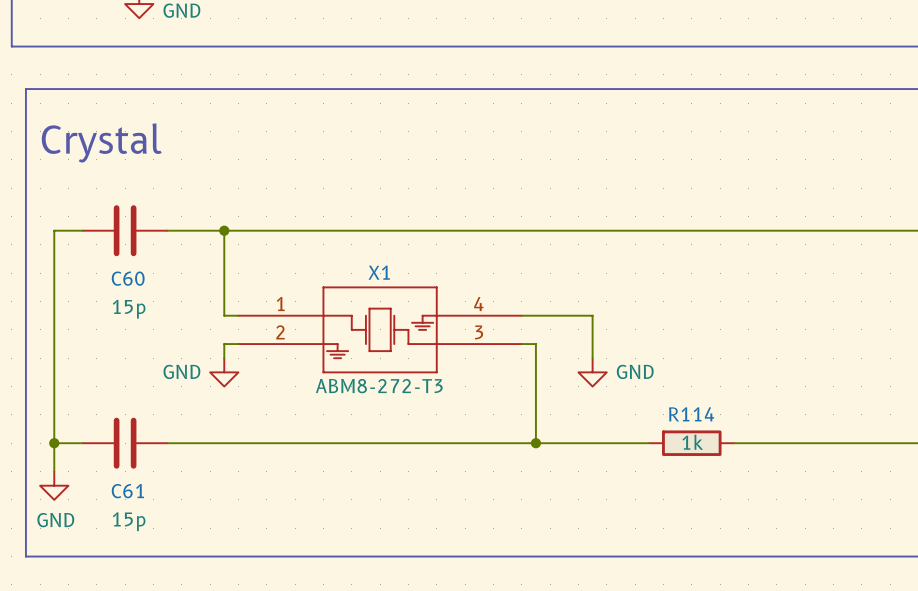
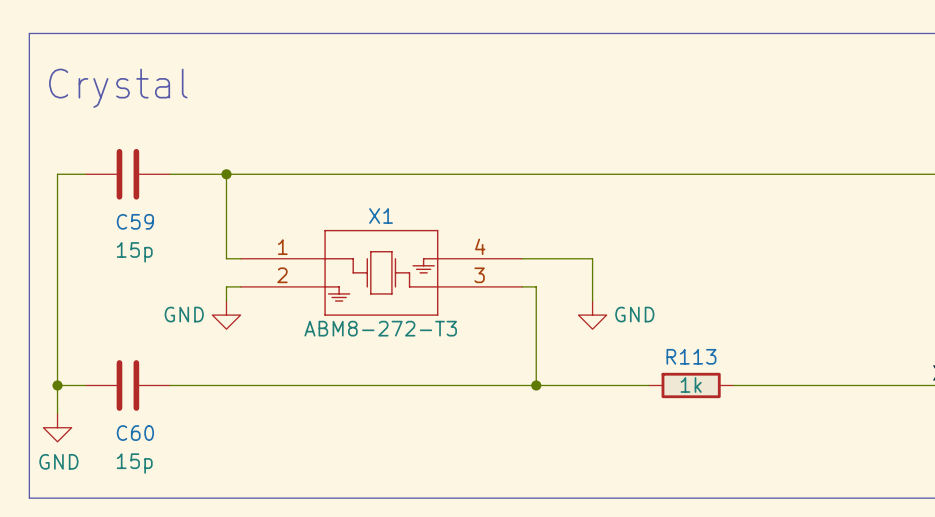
C60 name: C60 (128, 278) -> C59 (135, 221)
R114 name: R114 (691, 414) -> R113 (691, 356)
C61 name: C61 (127, 491) -> C60 (135, 433)

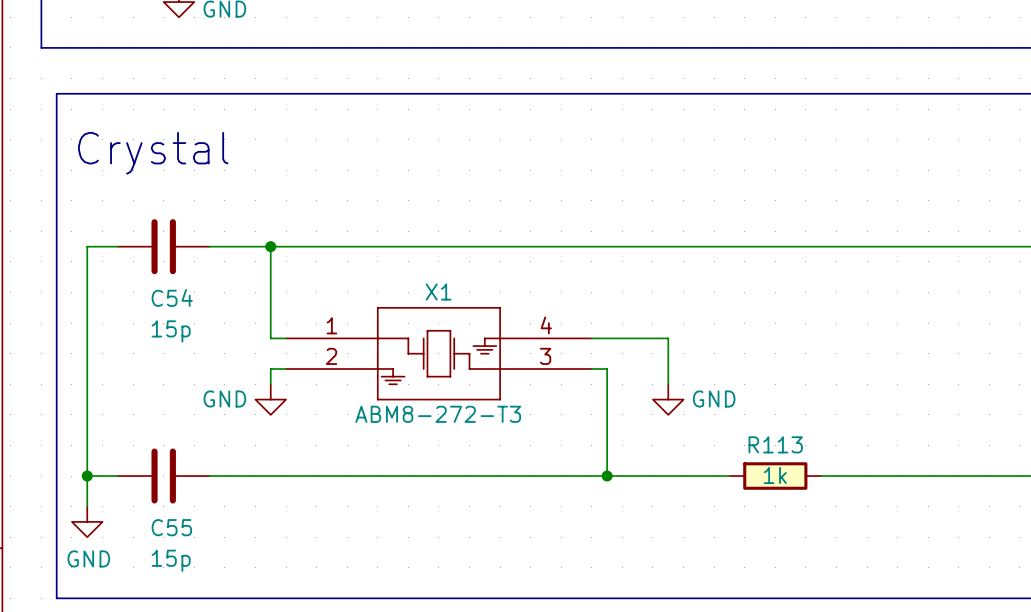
C59 name: C59 (135, 221) -> C54 (172, 297)
C60 name: C60 (135, 433) -> C55 (171, 527)

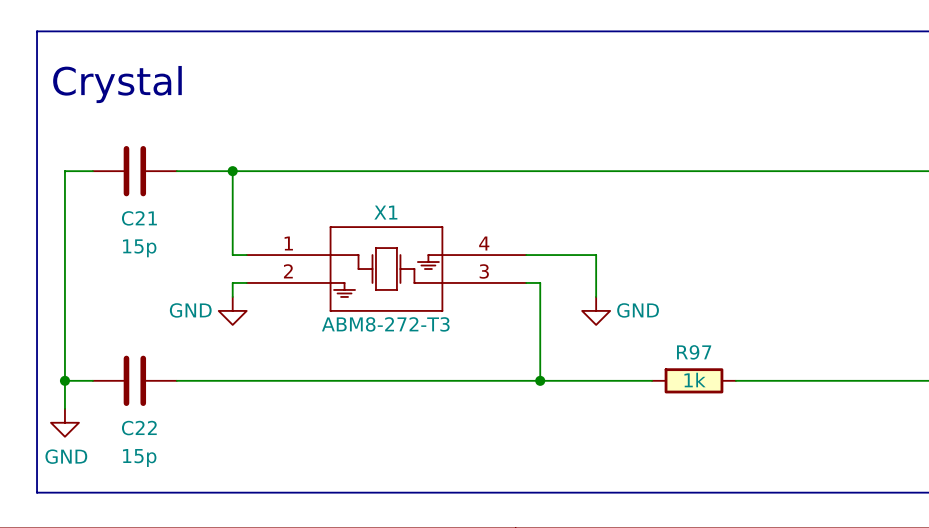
C54 name: C54 (172, 297) -> C21 (139, 218)
R113 name: R113 (775, 444) -> R97 (694, 352)
C55 name: C55 (171, 527) -> C22 (139, 428)

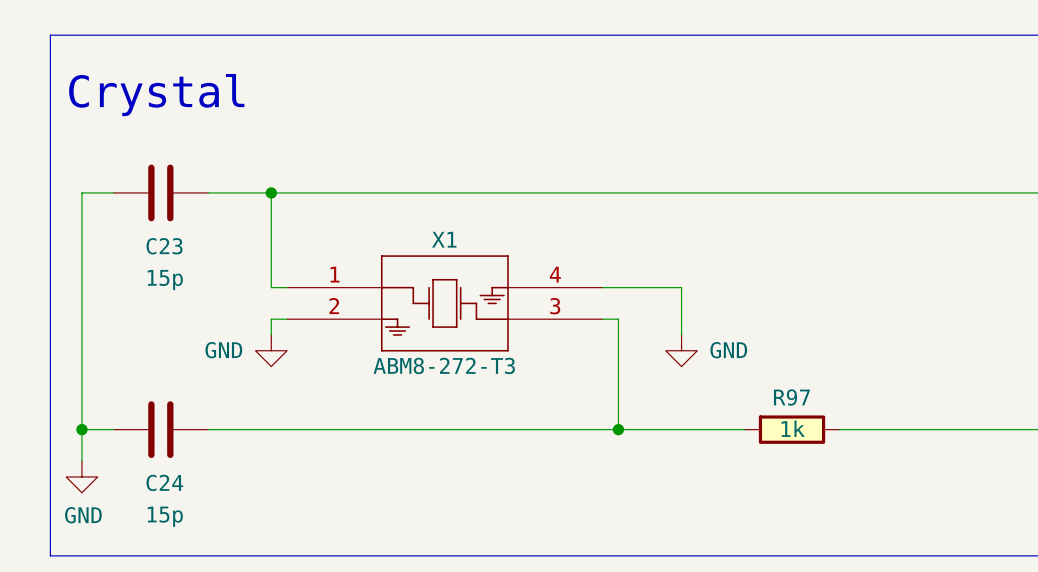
C21 name: C21 (139, 218) -> C23 (164, 246)
C22 name: C22 (139, 428) -> C24 (164, 482)

